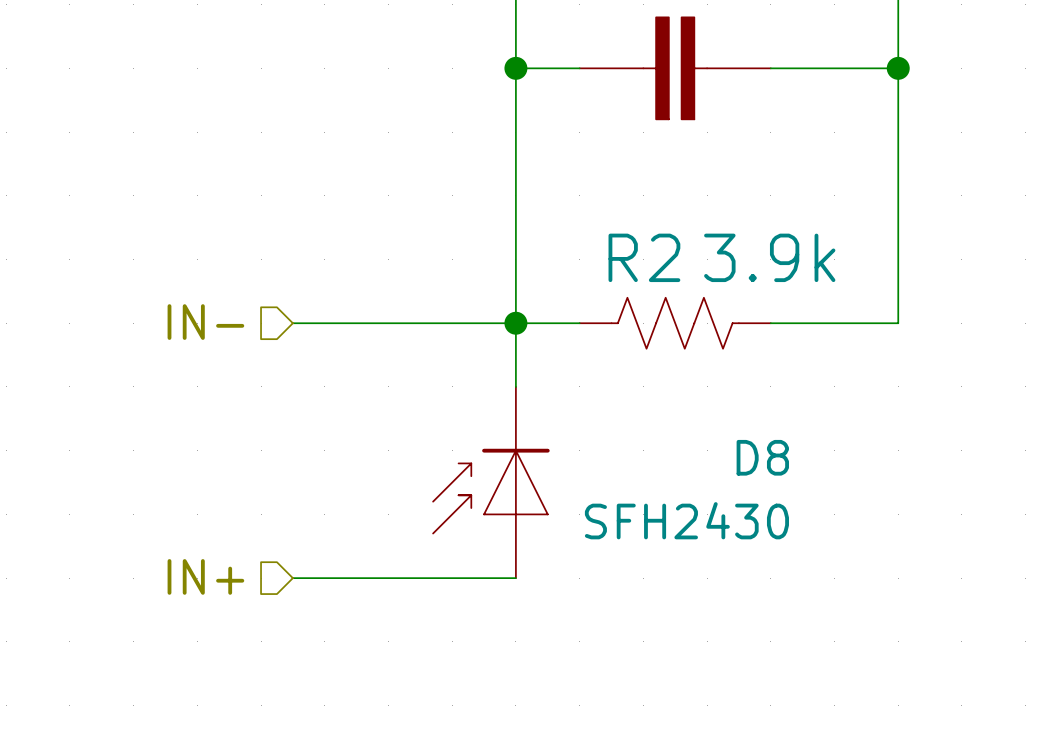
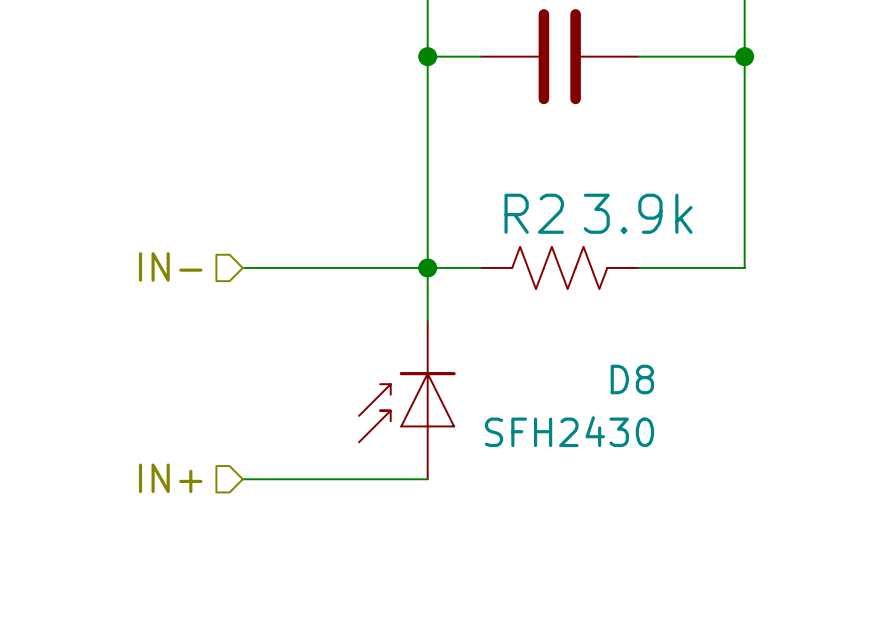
part symbol: [579, 17, 771, 120] -> [480, 9, 640, 105]

